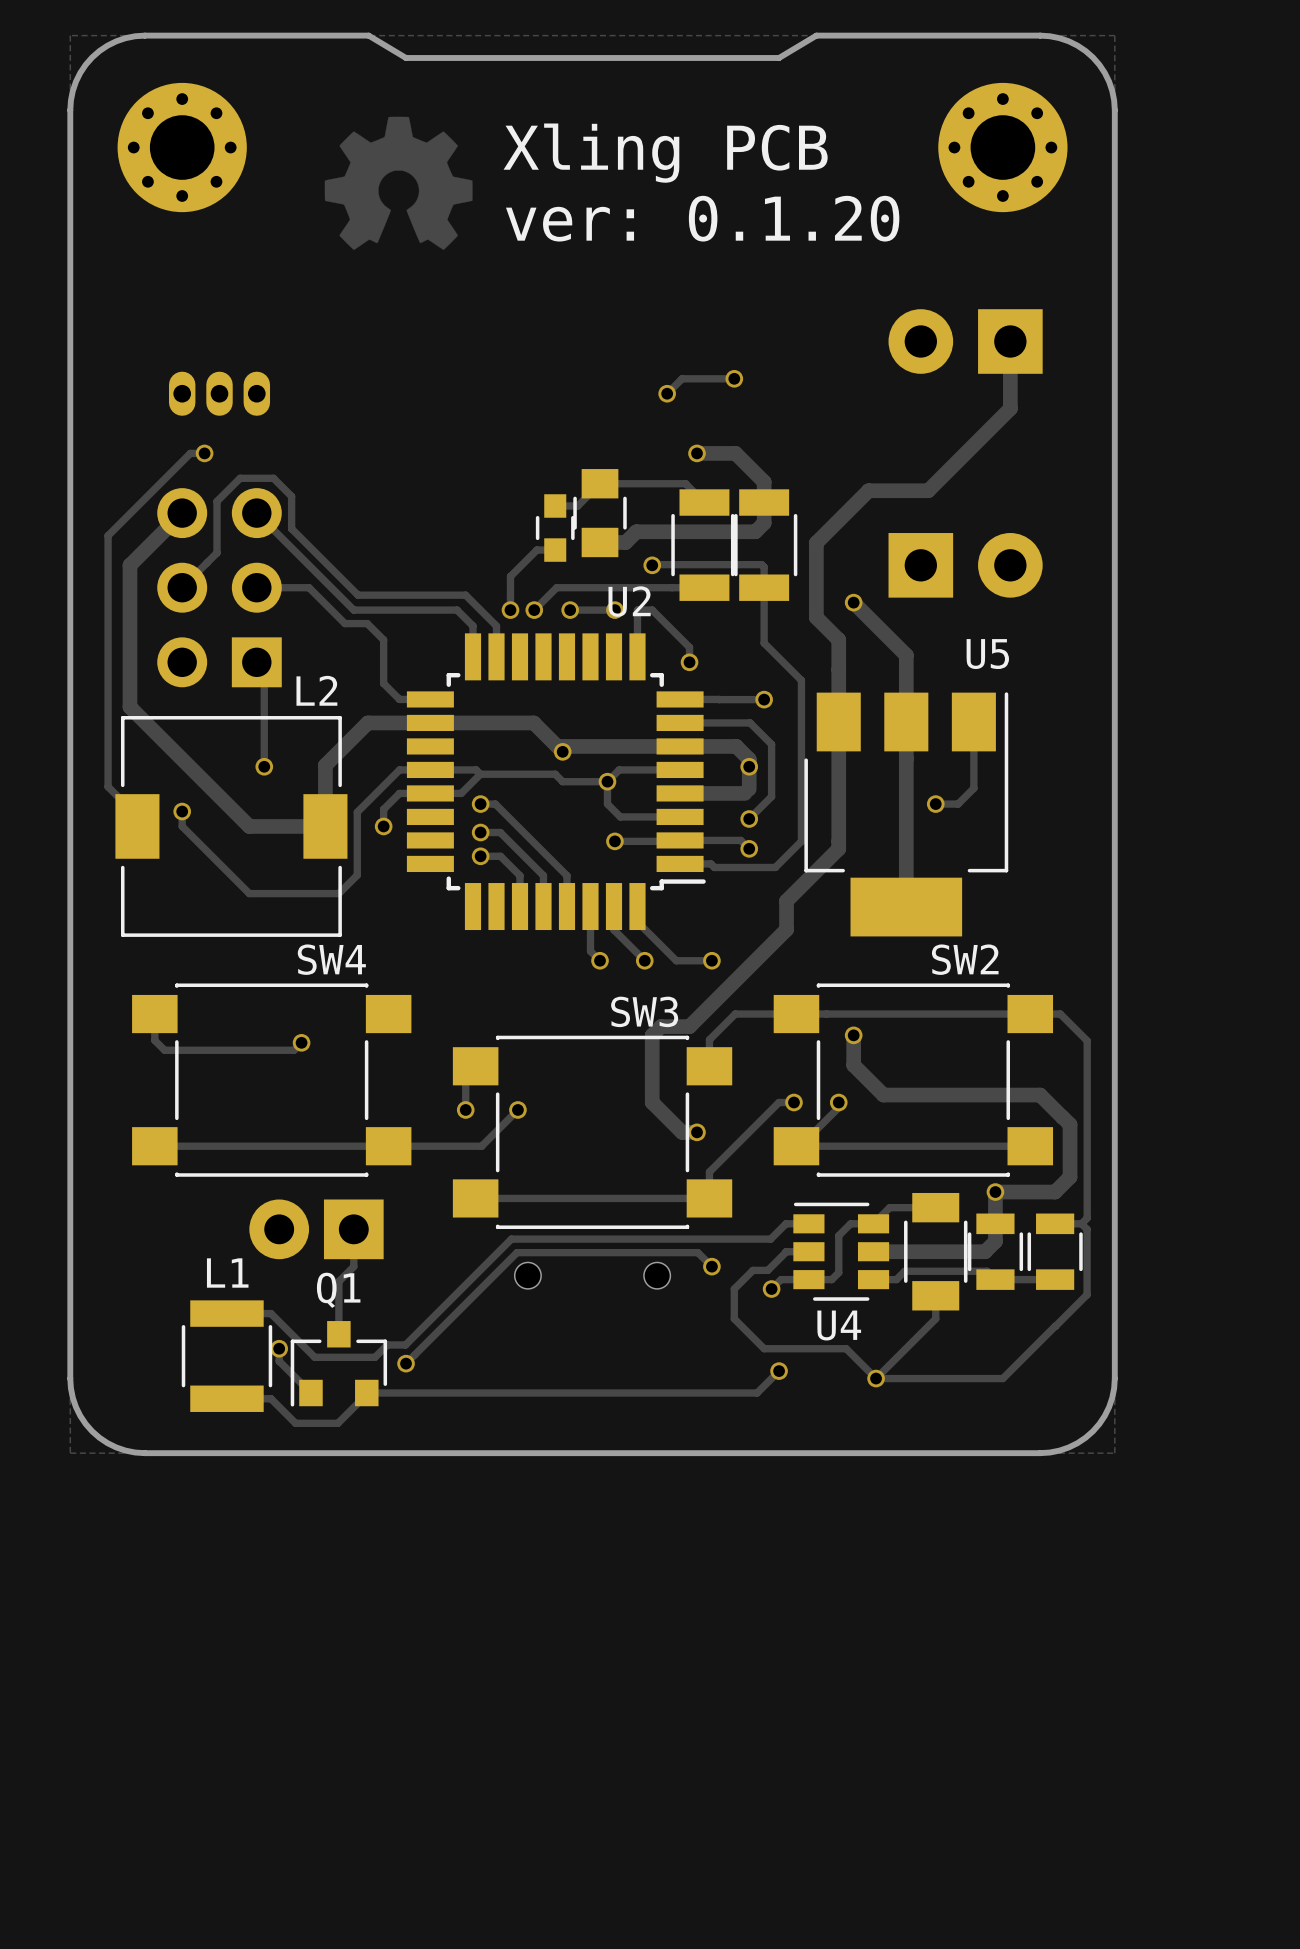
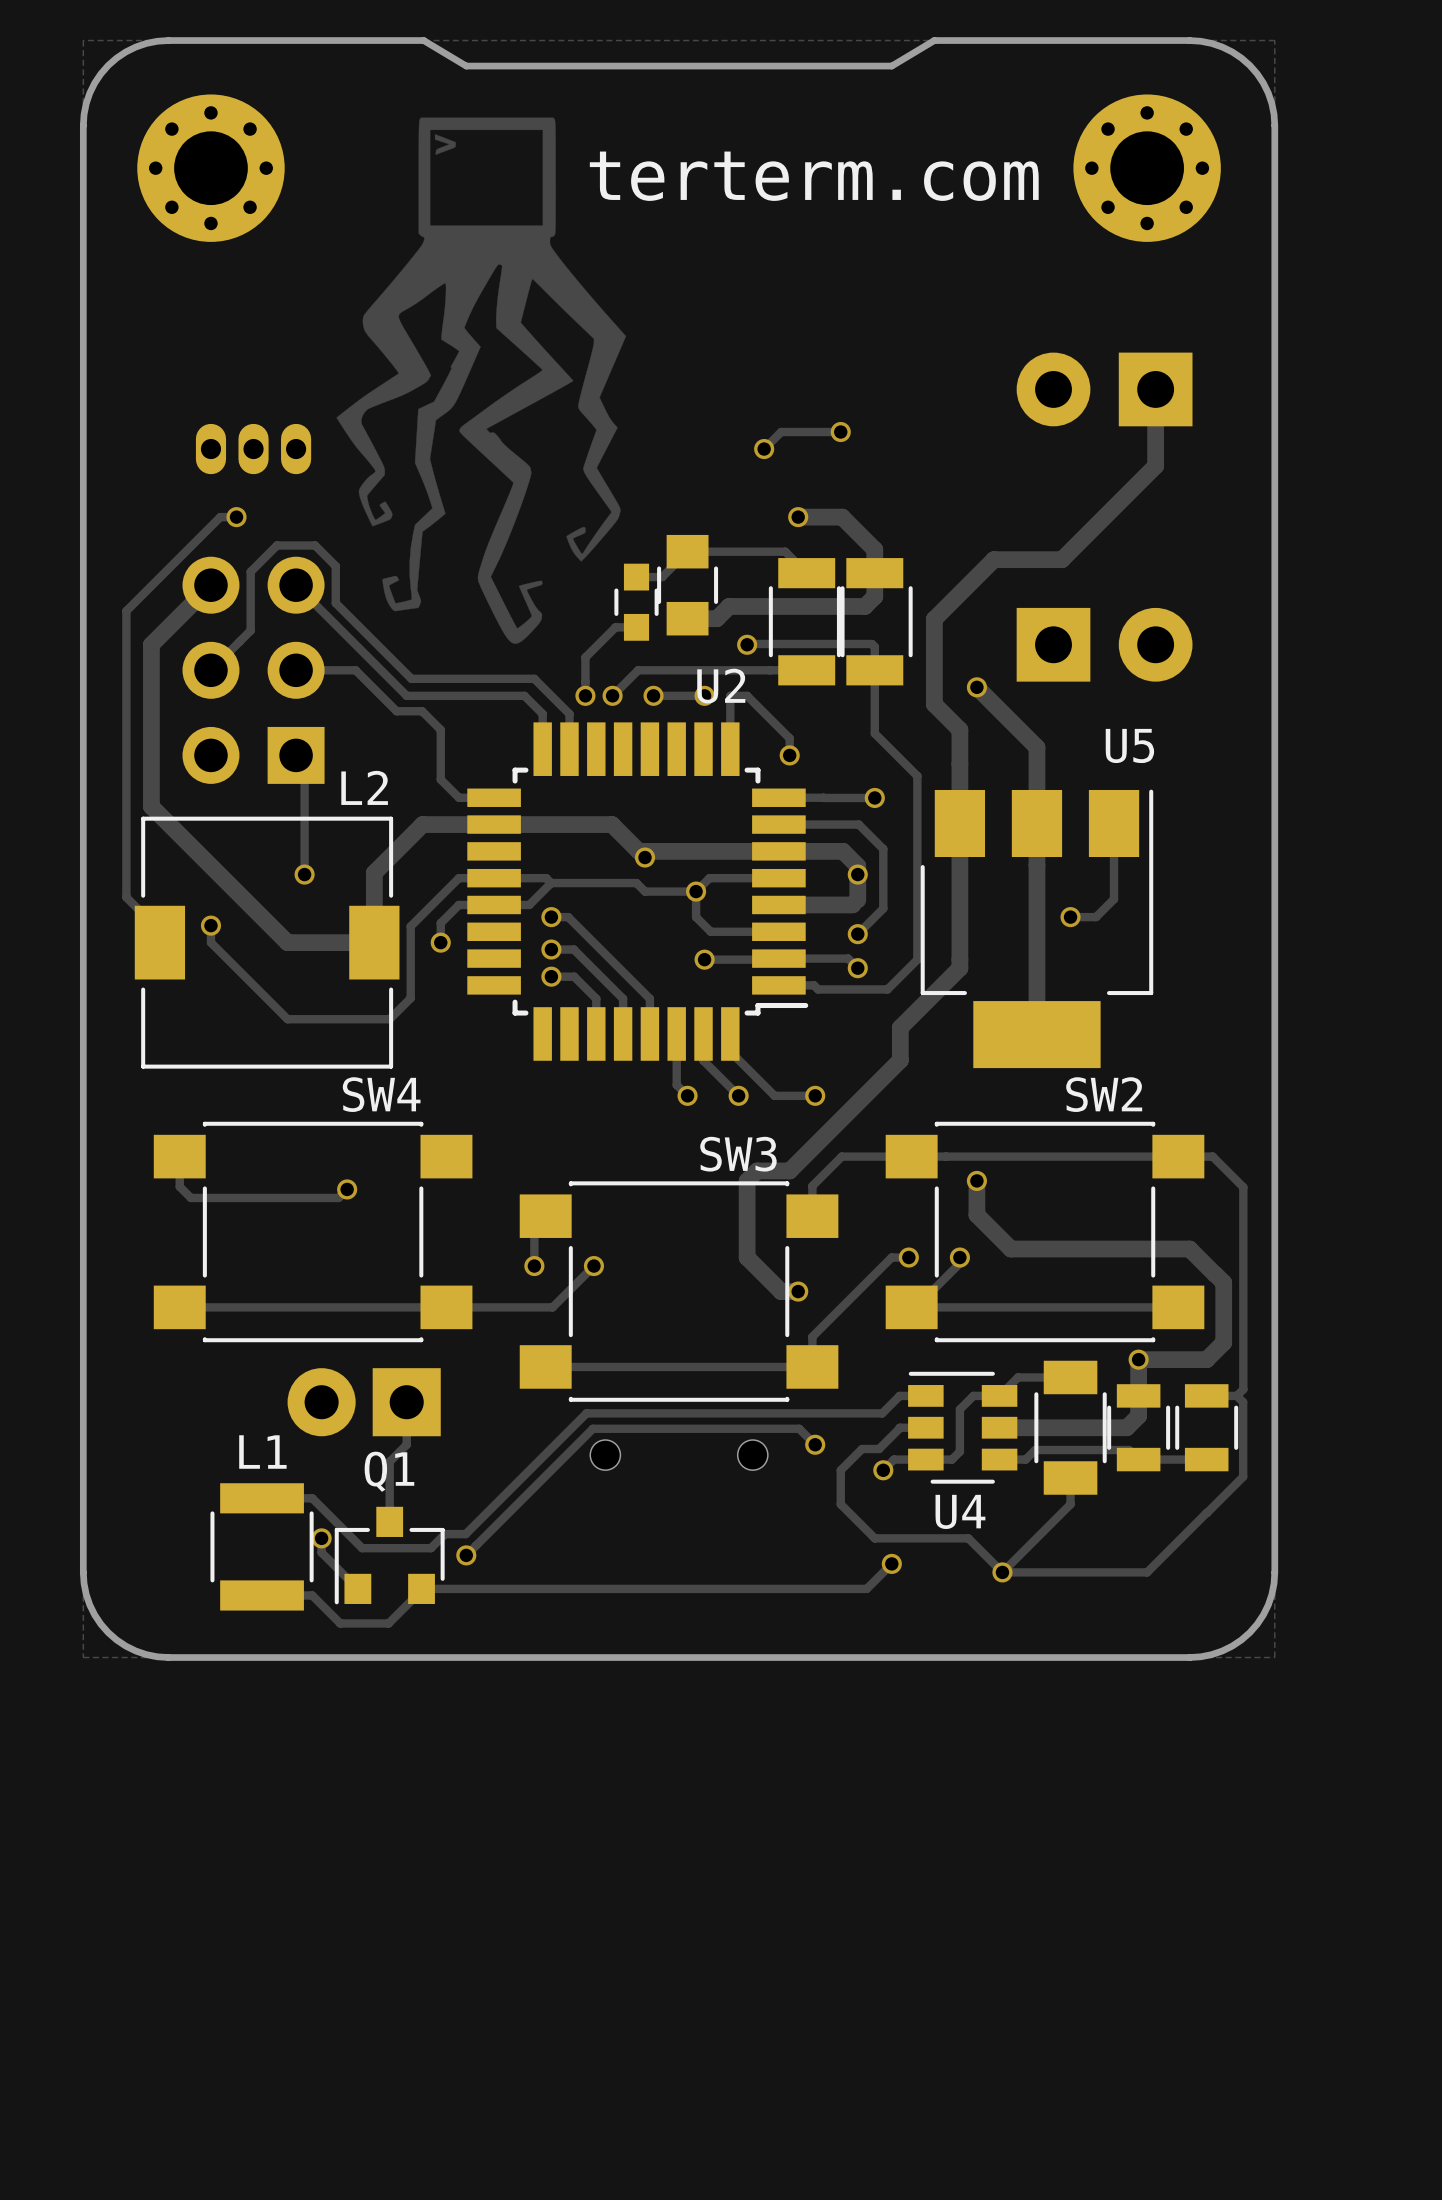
drawing: none -> [336, 117, 627, 644]
drawing: [324, 116, 473, 250] -> none
text: Xling PCB (665, 153) -> terterm.com (814, 176)
text: ver: 0.1.20 (702, 218) -> none

